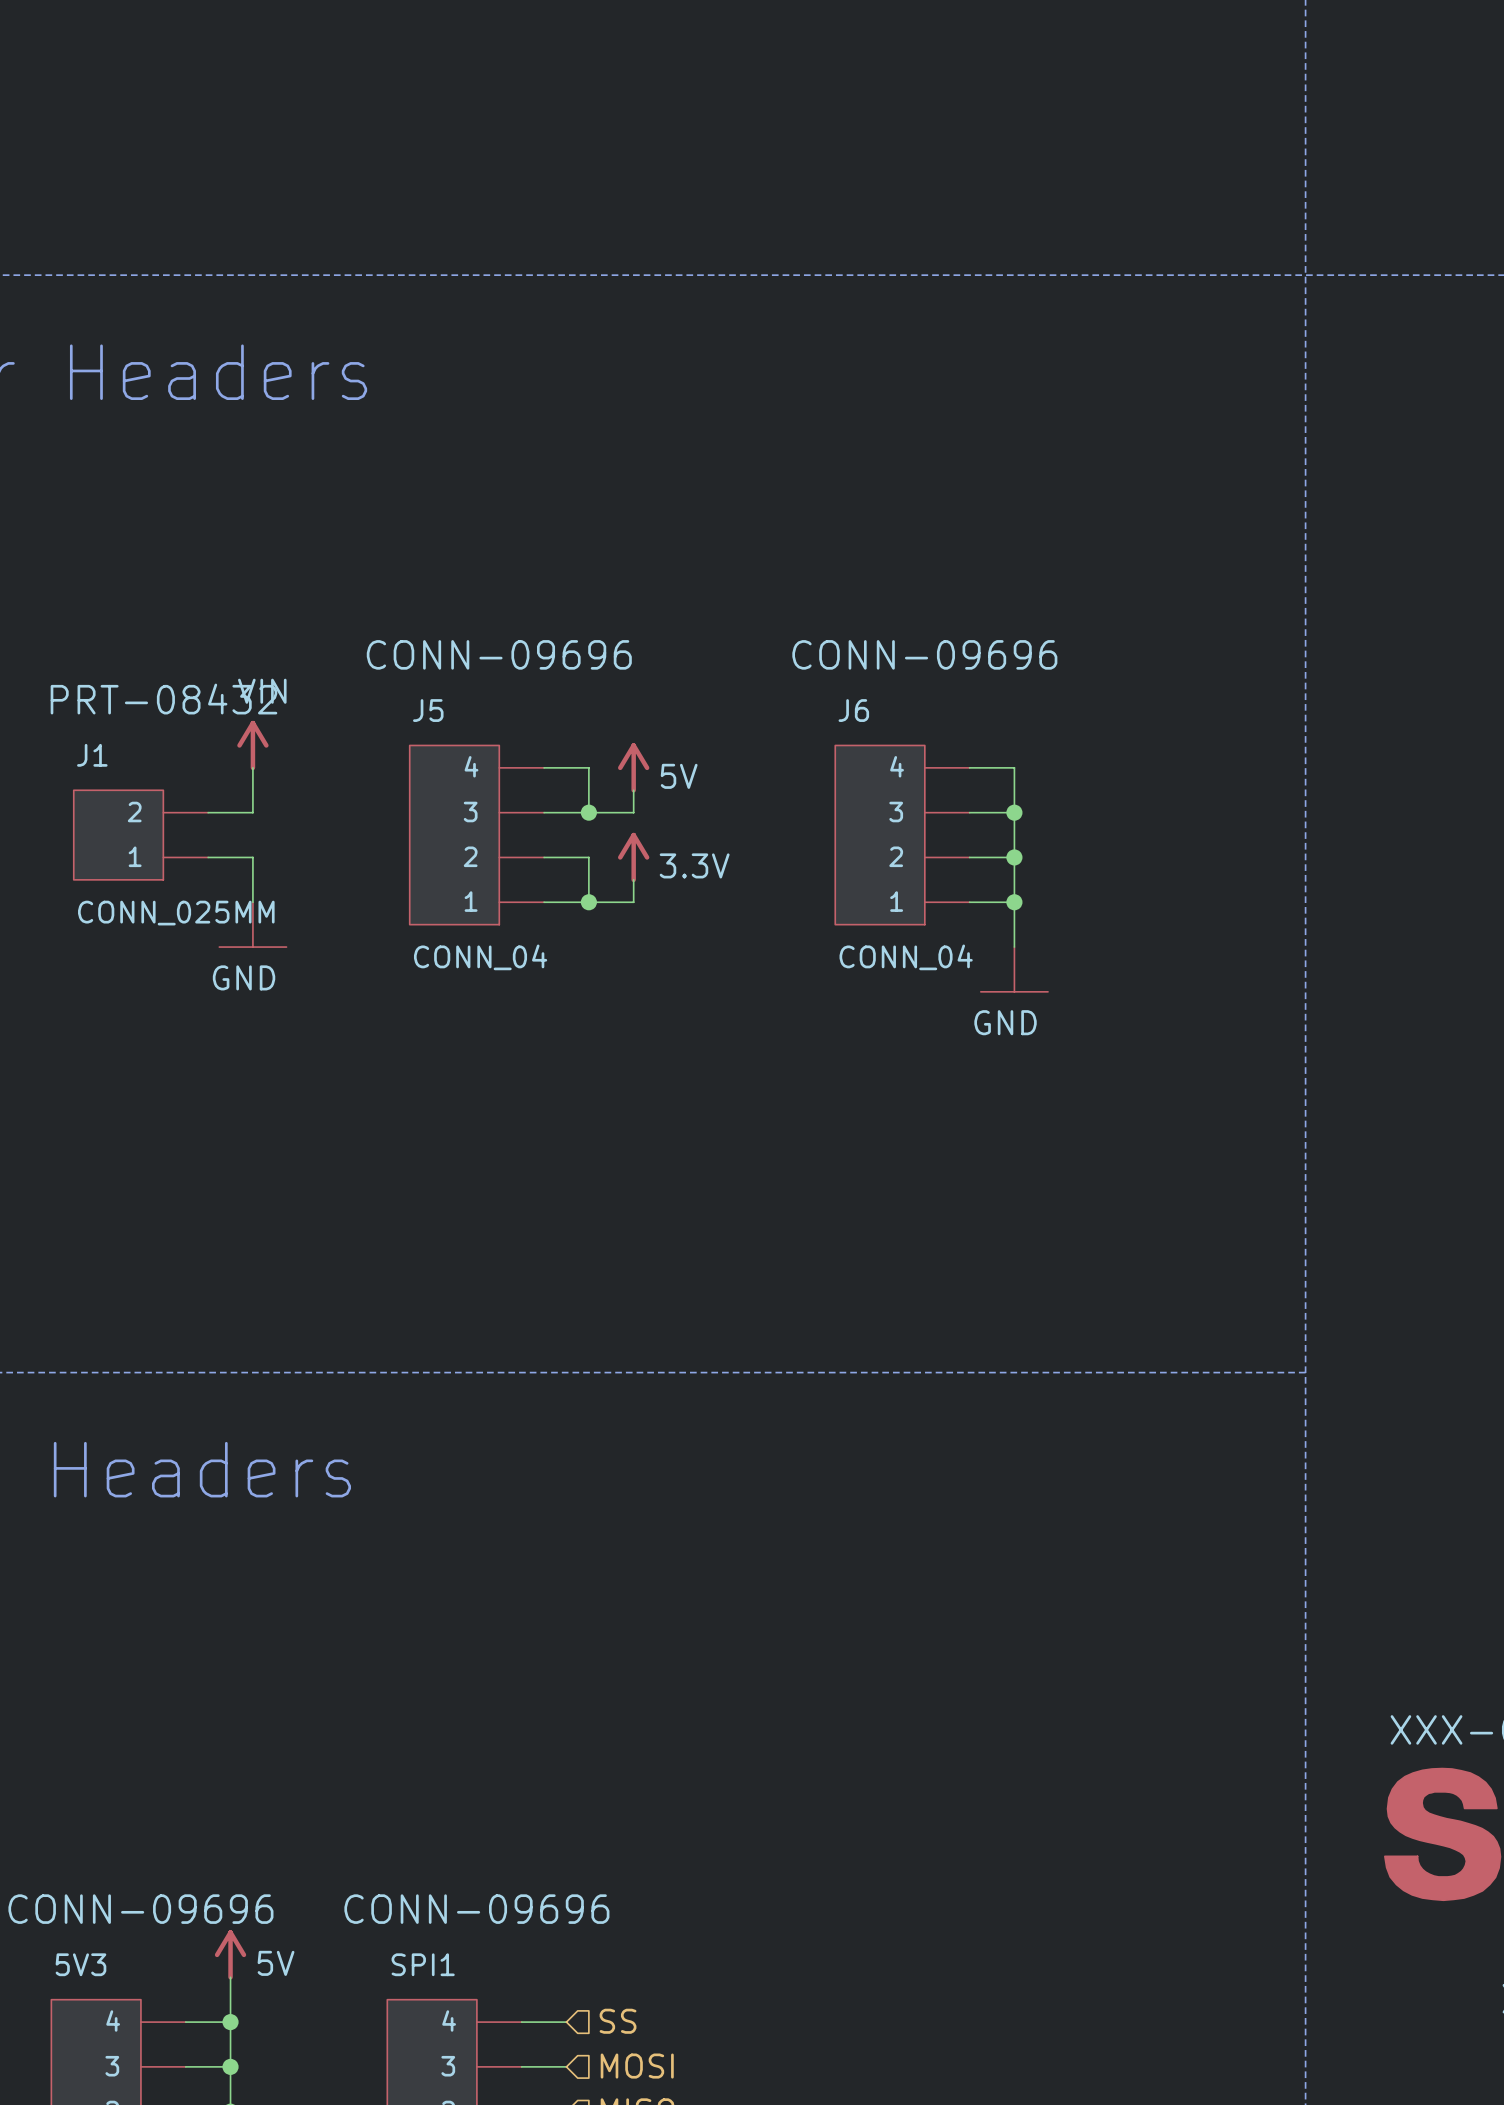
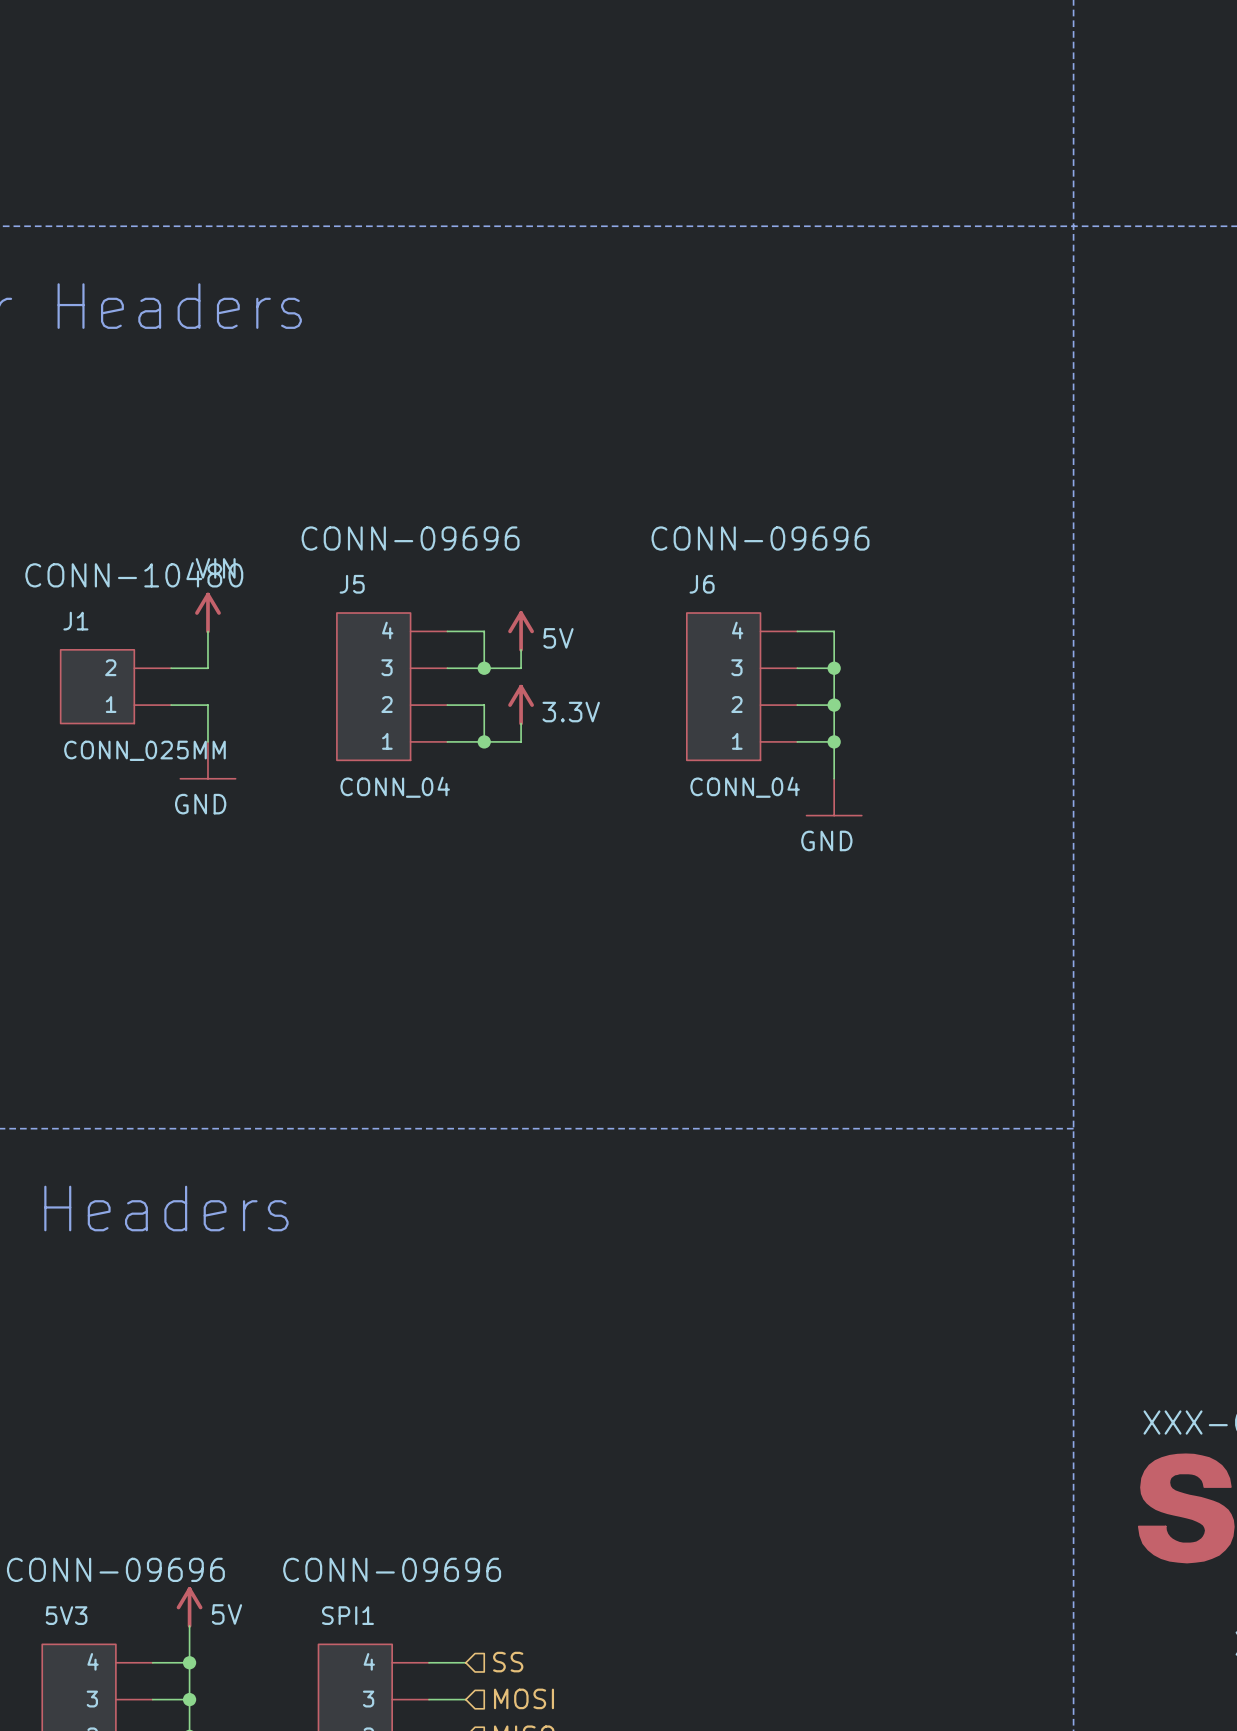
J1 text: PRT-08432 (163, 699) -> CONN-10480 (134, 574)

